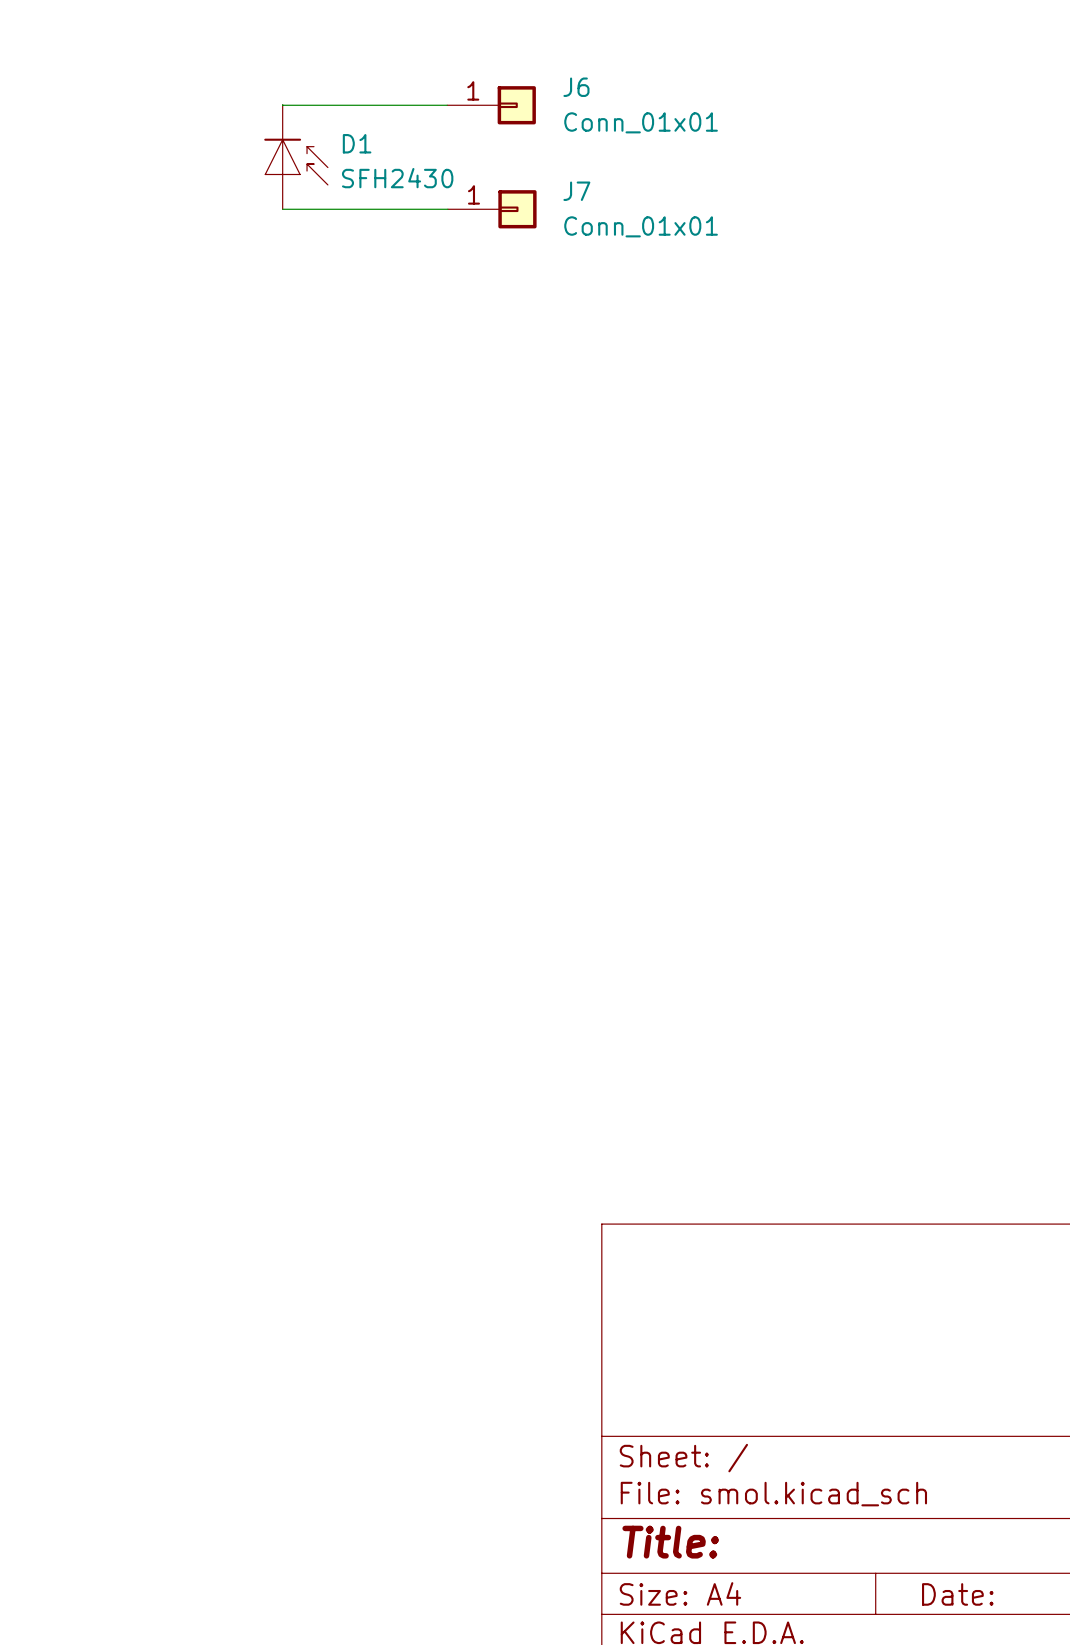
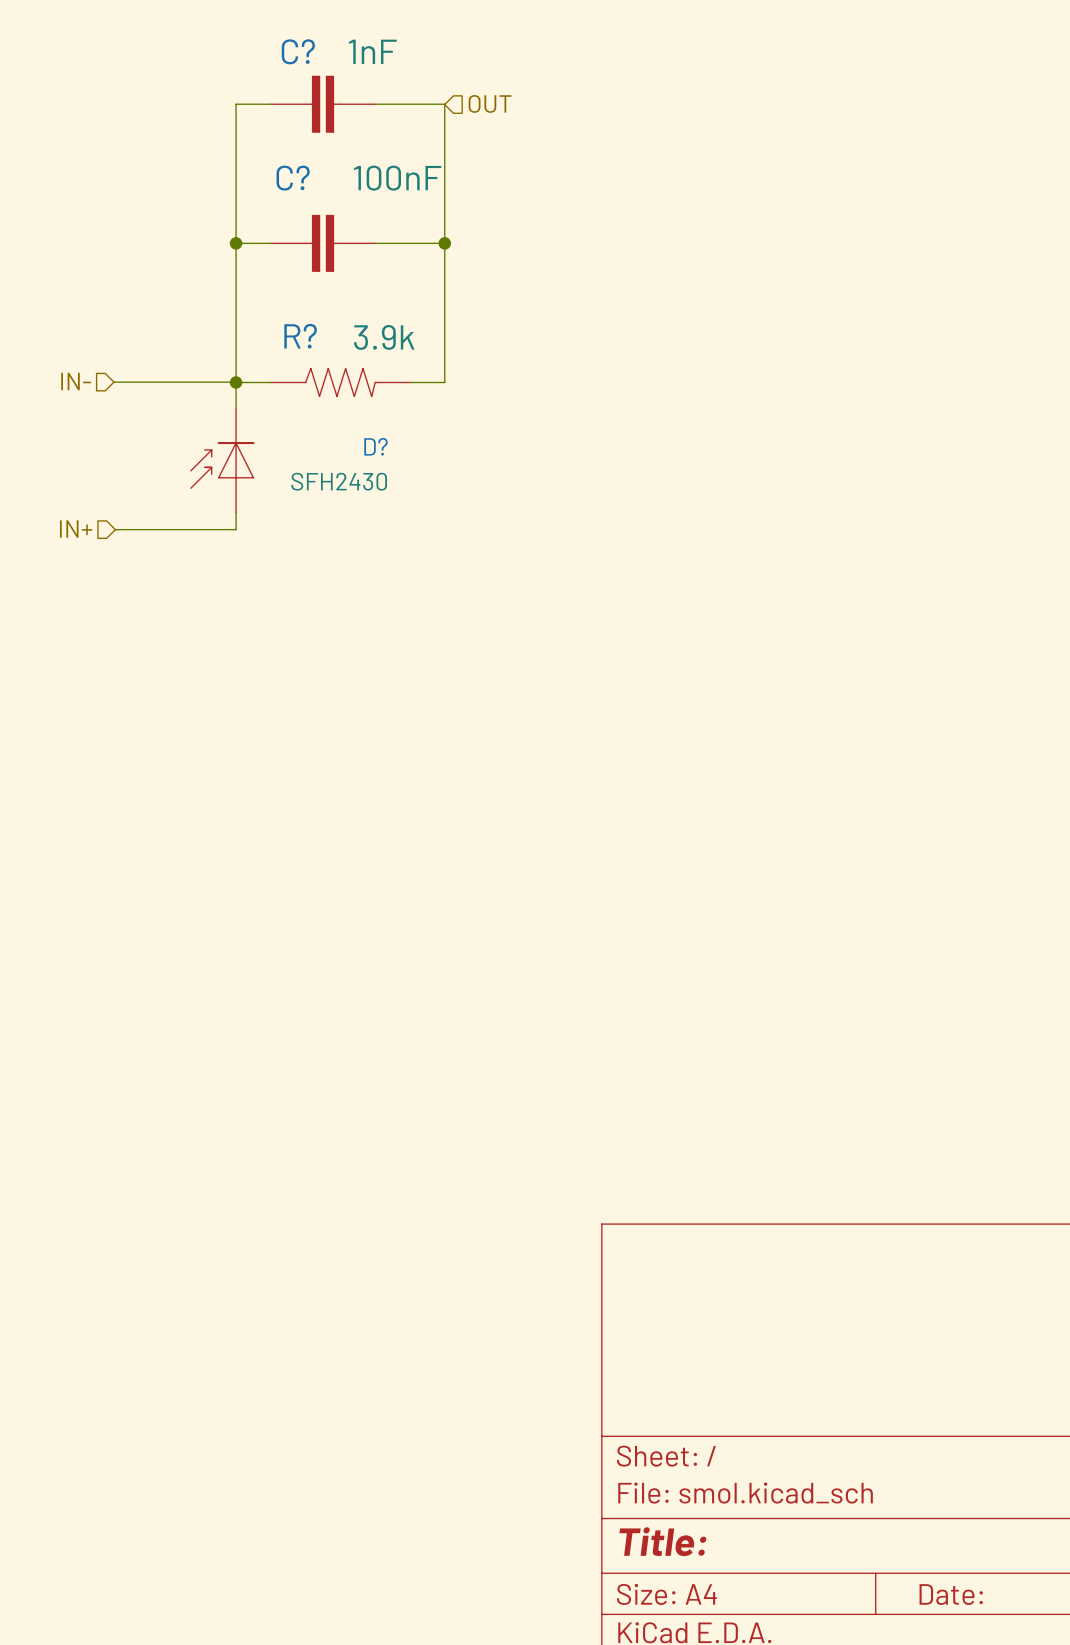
hierarchical label: none -> OUT (490, 103)
wire: none -> (270, 104) (236, 104) (236, 408)
C?: none -> 1nF (323, 104)
wire: none -> (375, 104) (444, 104) (444, 382) (409, 382)
J6: Conn_01x01 (491, 105) -> none
D1: SFH2430 (296, 157) -> none
wire: (282, 209) (447, 209) -> none
J7: Conn_01x01 (492, 209) -> none
wire: none -> (236, 243) (270, 243)
junction: none -> (236, 243)
C?: none -> 100nF (323, 243)
wire: none -> (375, 243) (444, 243)
junction: none -> (444, 243)
hierarchical label: none -> IN- (76, 381)
wire: none -> (113, 382) (270, 382)
junction: none -> (236, 382)
R?: none -> 3.9k (340, 382)
D?: none -> SFH2430 (222, 460)
wire: none -> (236, 512) (236, 529) (115, 529)
hierarchical label: none -> IN+ (76, 528)

